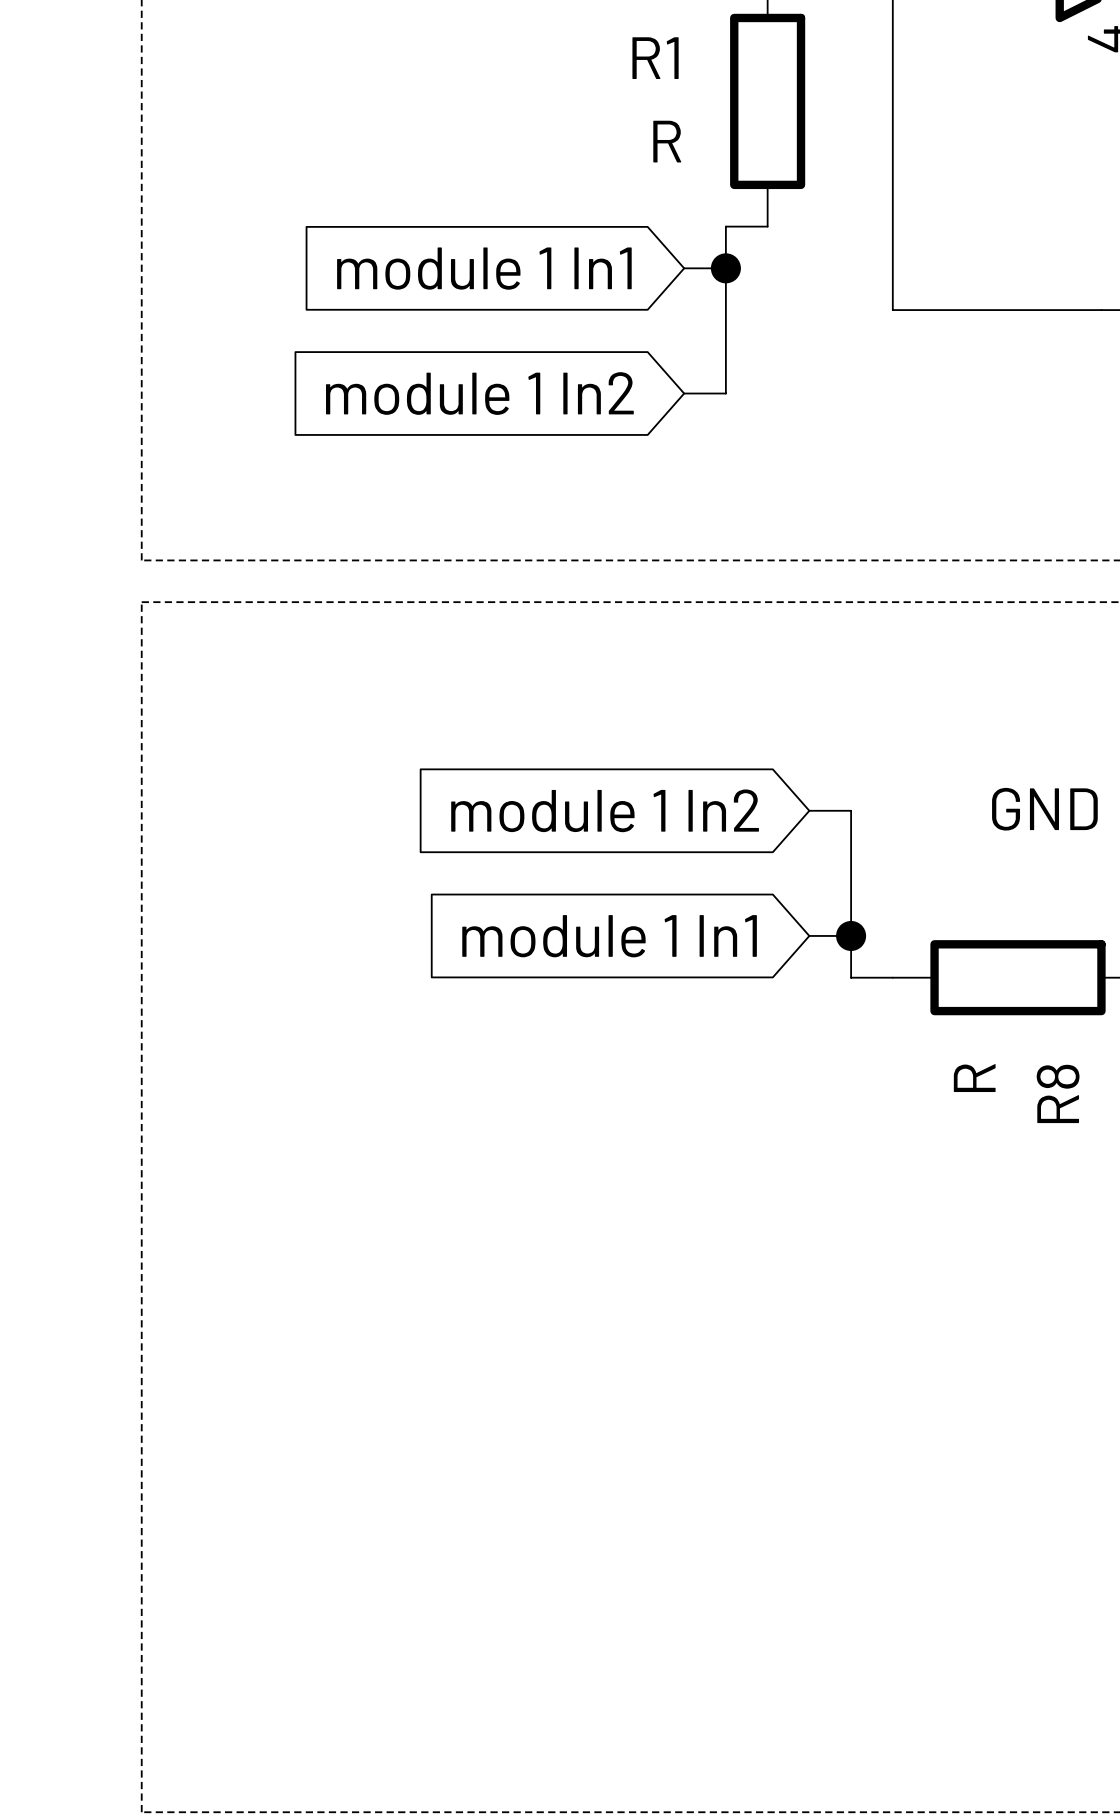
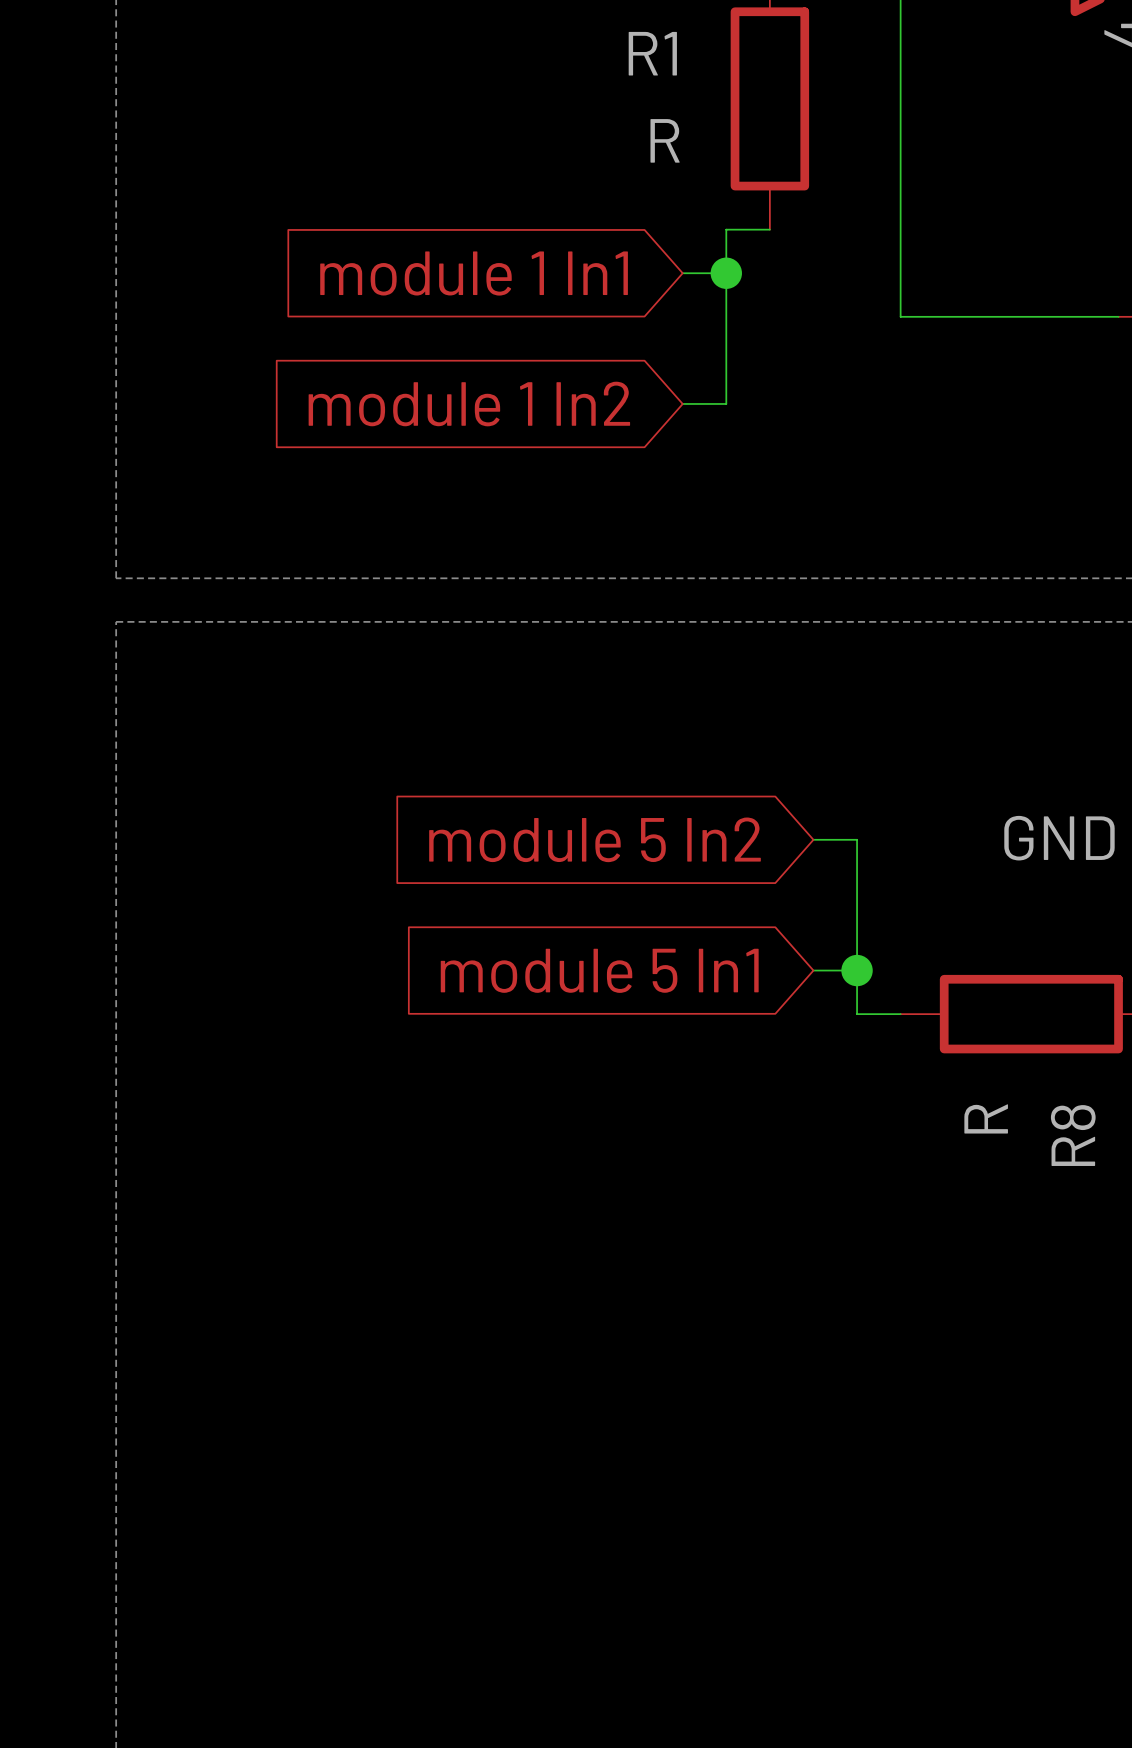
global label: module 1 In2 (605, 810) -> module 5 In2 (594, 839)
global label: module 1 In1 (609, 936) -> module 5 In1 (599, 970)

